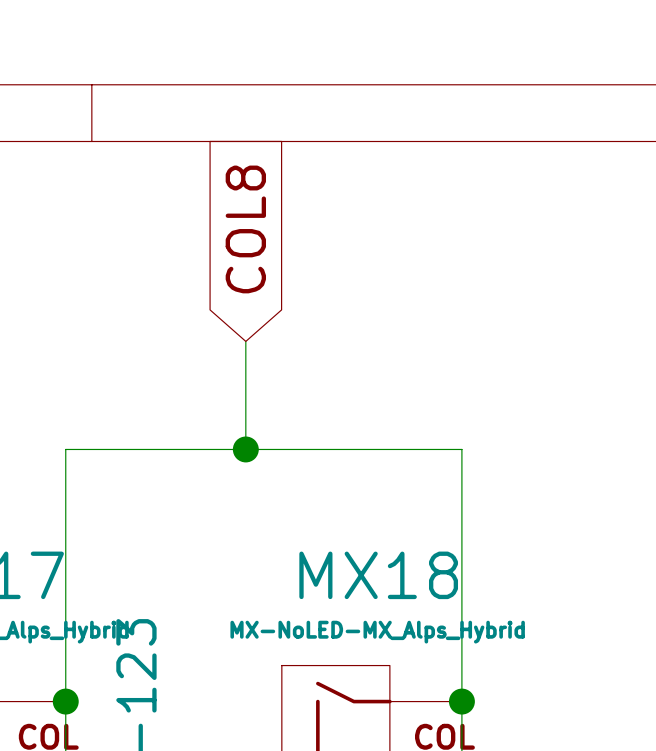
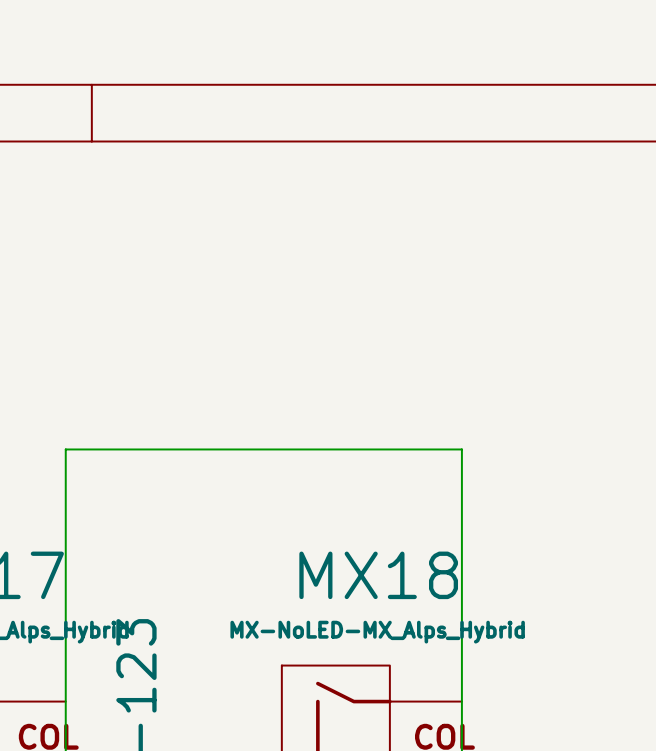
global label: COL8 (245, 229) -> none
wire: (245, 341) (245, 449) -> none
junction: (245, 449) -> none
junction: (65, 701) -> none
junction: (461, 701) -> none

